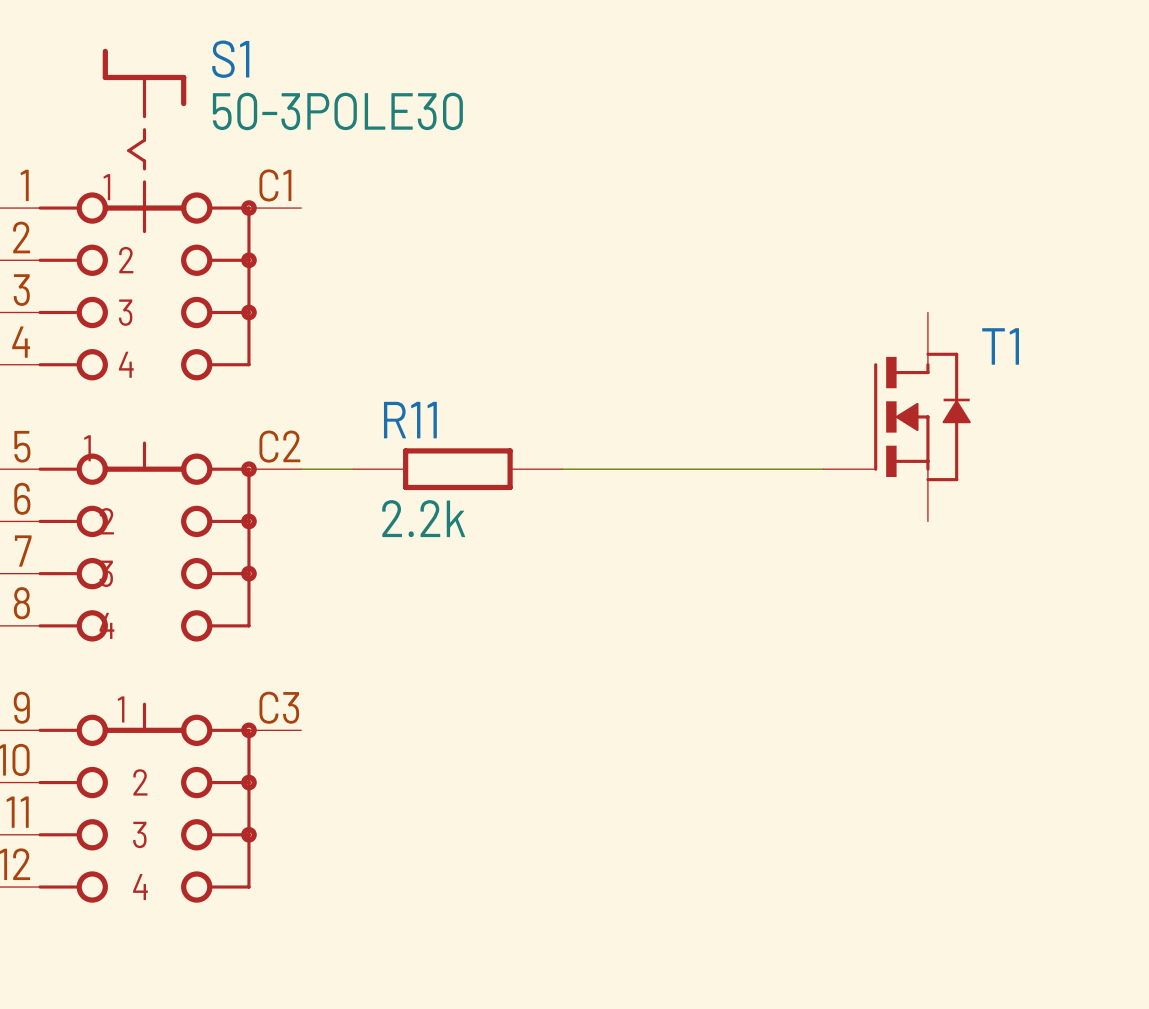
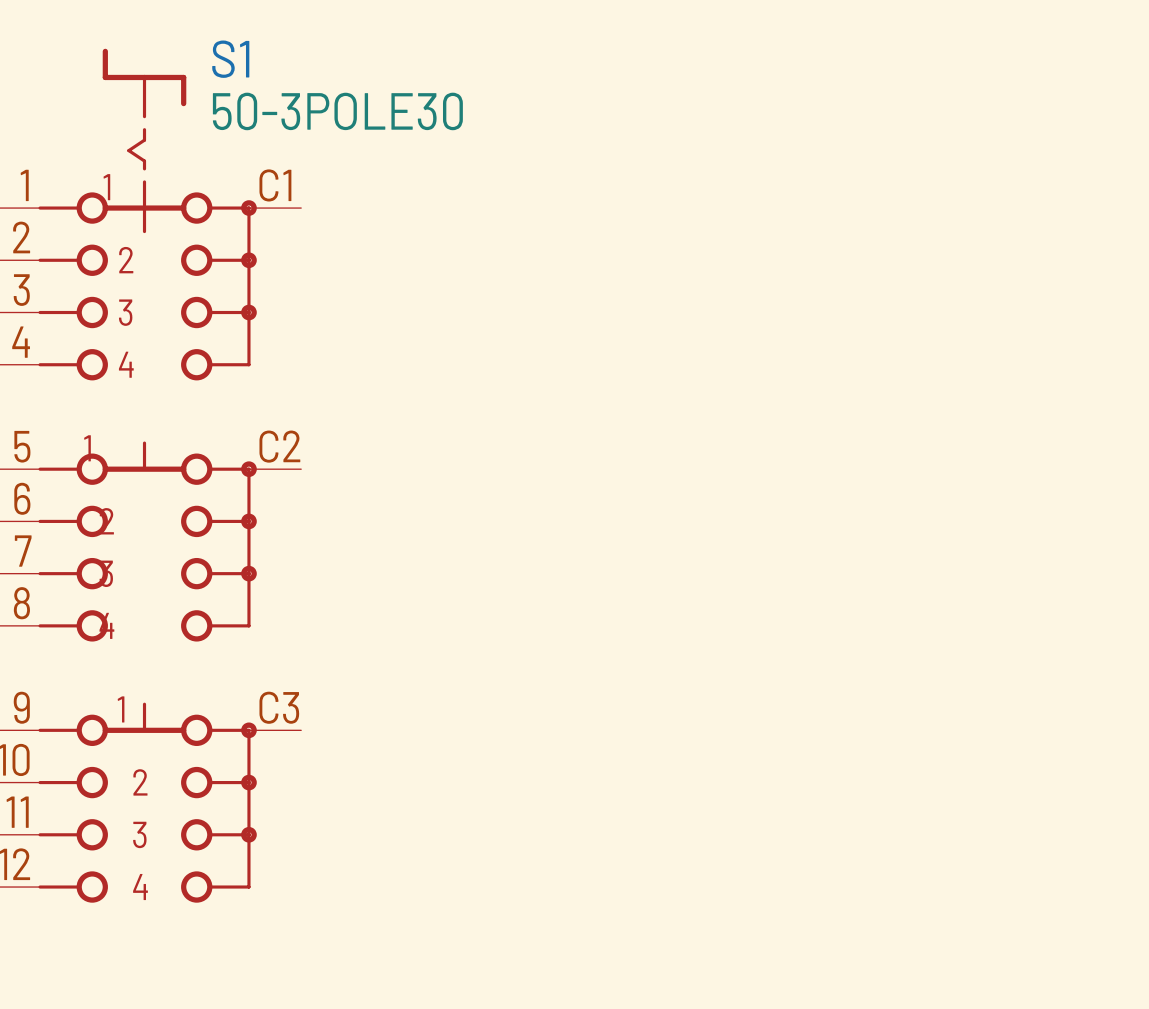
T1: (897, 416) -> none
wire: (301, 469) (353, 469) -> none
R11: 2.2k (457, 469) -> none
wire: (562, 469) (823, 469) -> none

